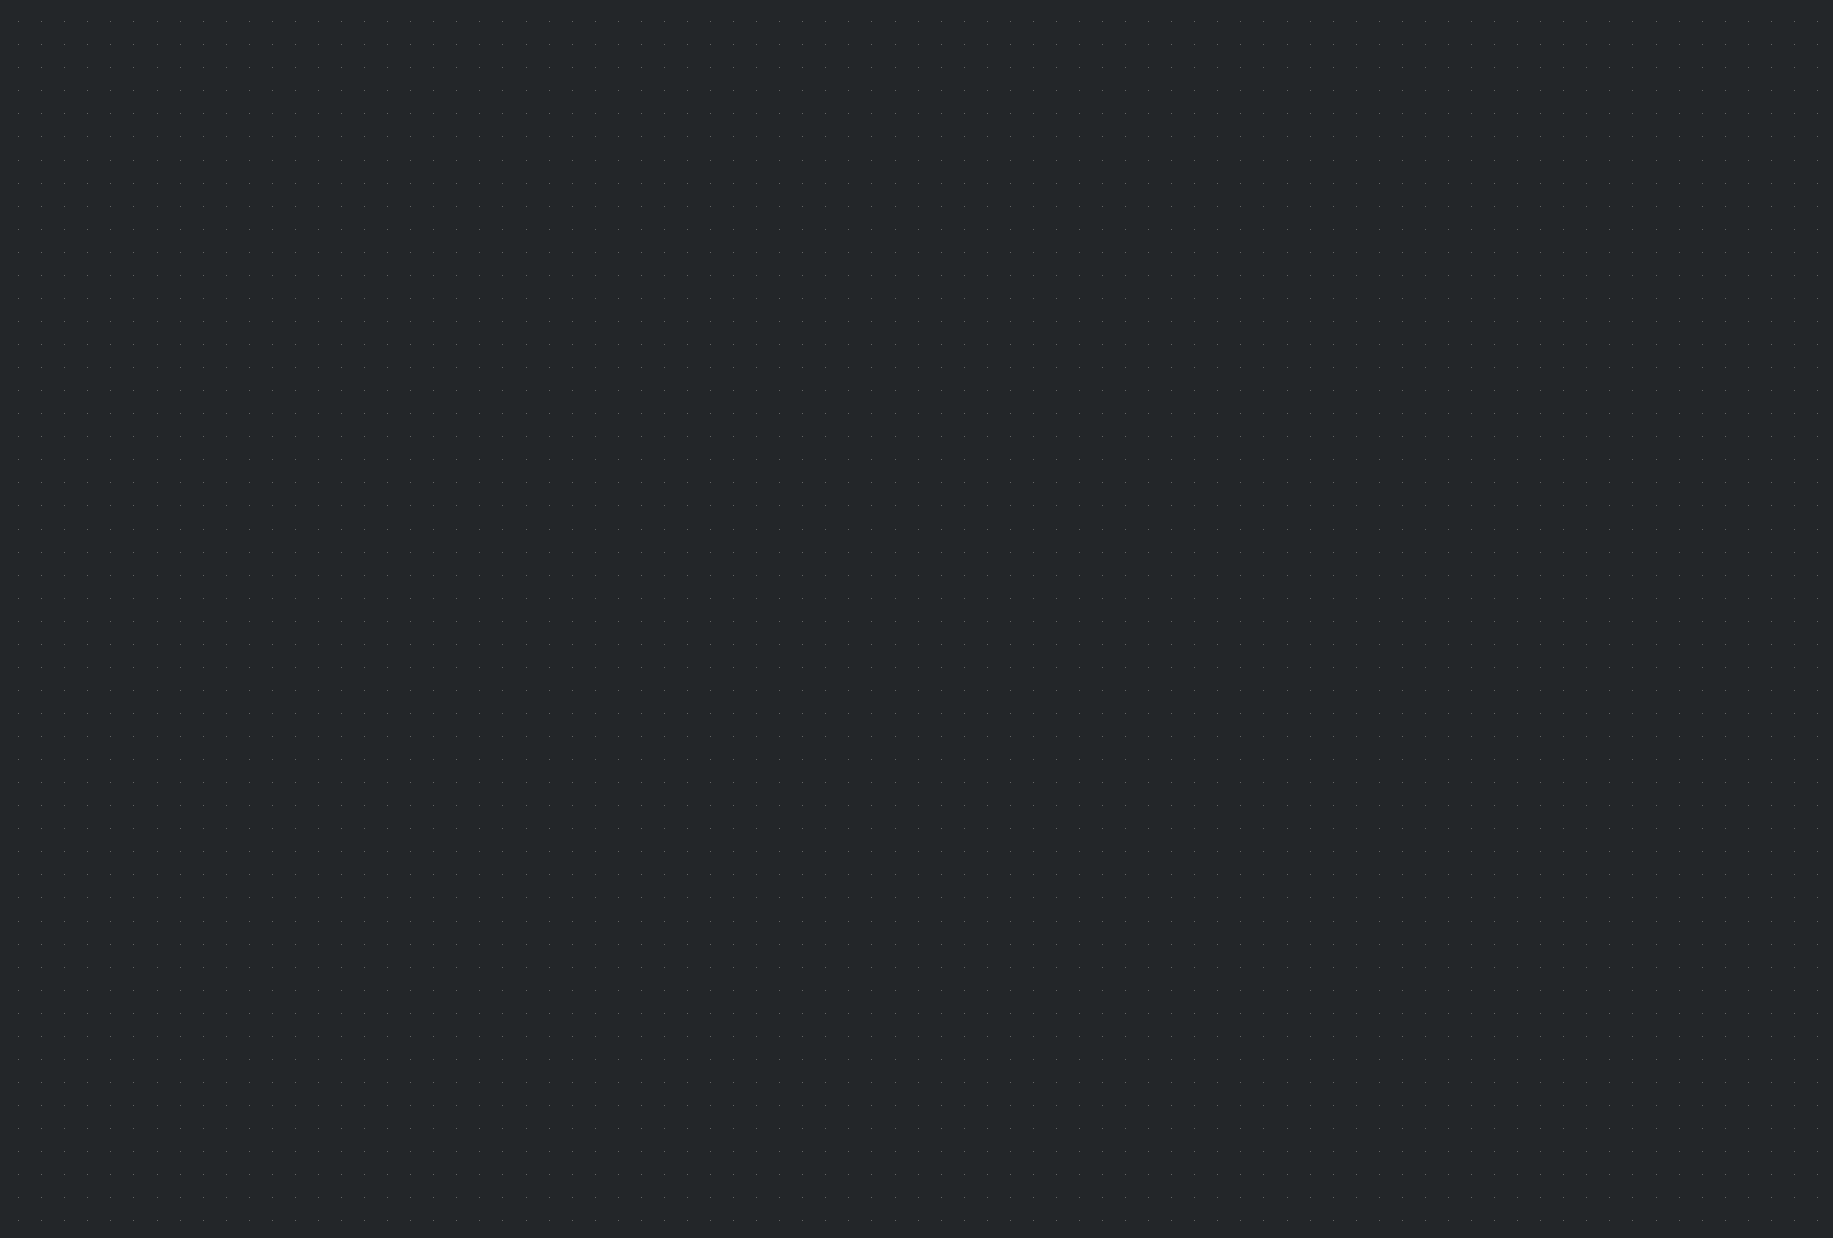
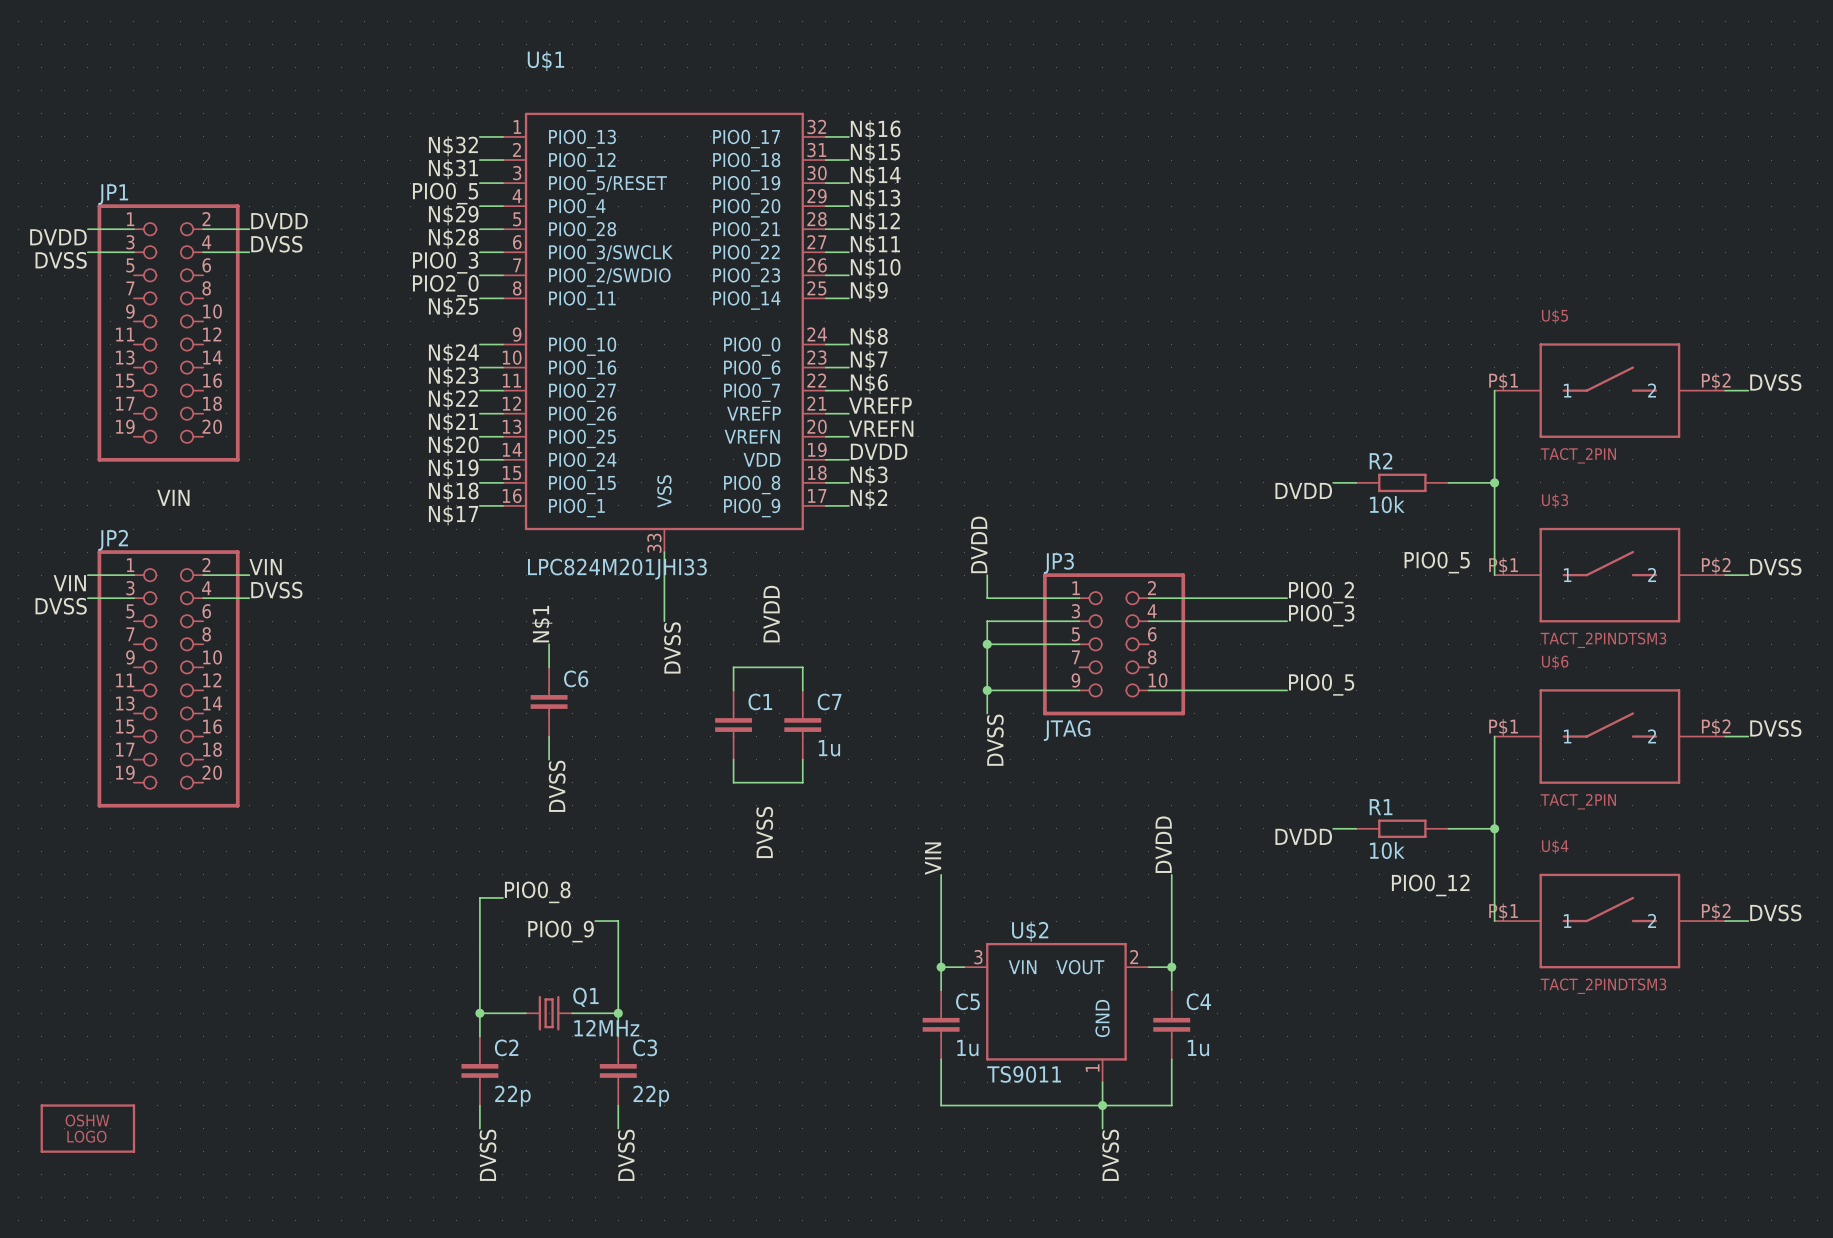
label: none -> N$16 (875, 130)
wire: none -> (479, 136) (502, 136)
wire: none -> (825, 136) (848, 136)
label: none -> N$32 (453, 146)
label: none -> N$15 (875, 153)
wire: none -> (479, 160) (502, 160)
wire: none -> (825, 160) (848, 160)
label: none -> N$31 (453, 169)
label: none -> N$14 (875, 176)
wire: none -> (479, 183) (502, 183)
wire: none -> (825, 183) (848, 183)
label: none -> PIO0_5 (445, 193)
label: none -> N$13 (875, 199)
wire: none -> (479, 206) (502, 206)
wire: none -> (825, 206) (848, 206)
label: none -> N$29 (453, 215)
label: none -> DVDD (279, 221)
label: none -> N$12 (875, 222)
wire: none -> (87, 229) (133, 229)
wire: none -> (203, 229) (249, 229)
wire: none -> (479, 229) (502, 229)
wire: none -> (825, 229) (848, 229)
label: none -> DVDD (58, 237)
label: none -> N$28 (453, 238)
label: none -> DVSS (276, 244)
label: none -> N$11 (875, 245)
wire: none -> (87, 252) (133, 252)
wire: none -> (203, 252) (249, 252)
wire: none -> (479, 252) (502, 252)
wire: none -> (825, 252) (848, 252)
label: none -> DVSS (61, 260)
label: none -> PIO0_3 (445, 262)
label: none -> N$10 (875, 268)
wire: none -> (479, 275) (502, 275)
wire: none -> (825, 275) (848, 275)
label: none -> PIO2_0 (445, 285)
label: none -> N$9 (869, 291)
wire: none -> (479, 298) (502, 298)
wire: none -> (825, 298) (848, 298)
label: none -> N$25 (453, 307)
JP1: none -> (168, 332)
U$1: none -> LPC824M201JHI33 (664, 332)
label: none -> N$8 (869, 337)
wire: none -> (479, 344) (502, 344)
wire: none -> (825, 344) (848, 344)
label: none -> N$24 (453, 353)
label: none -> N$7 (869, 360)
wire: none -> (479, 367) (502, 367)
wire: none -> (825, 367) (848, 367)
label: none -> N$23 (453, 376)
label: none -> DVSS (1775, 382)
label: none -> N$6 (869, 383)
wire: none -> (479, 390) (502, 390)
wire: none -> (825, 390) (848, 390)
wire: none -> (1494, 390) (1494, 575)
U$5: none -> TACT_2PIN (1609, 390)
wire: none -> (1725, 390) (1748, 390)
label: none -> N$22 (453, 399)
label: none -> VREFP (880, 405)
wire: none -> (479, 413) (502, 413)
wire: none -> (825, 413) (848, 413)
label: none -> N$21 (453, 423)
label: none -> VREFN (881, 428)
wire: none -> (479, 436) (502, 436)
wire: none -> (825, 436) (848, 436)
label: none -> N$20 (453, 446)
label: none -> DVDD (879, 451)
wire: none -> (479, 459) (502, 459)
wire: none -> (825, 459) (848, 459)
label: none -> N$19 (453, 469)
label: none -> N$3 (869, 476)
wire: none -> (479, 482) (502, 482)
wire: none -> (825, 482) (848, 482)
wire: none -> (1333, 482) (1356, 482)
R2: none -> 10k (1402, 482)
wire: none -> (1448, 482) (1494, 482)
junction: none -> (1494, 482)
label: none -> DVDD (1303, 490)
label: none -> N$18 (453, 492)
label: none -> VIN (173, 497)
label: none -> N$2 (869, 499)
wire: none -> (479, 505) (502, 505)
wire: none -> (825, 505) (848, 505)
label: none -> N$17 (453, 515)
label: none -> DVDD (979, 544)
wire: none -> (664, 552) (664, 621)
label: none -> PIO0_5 (1437, 562)
label: none -> VIN (265, 567)
label: none -> DVSS (1775, 567)
wire: none -> (87, 575) (133, 575)
wire: none -> (203, 575) (249, 575)
wire: none -> (987, 575) (987, 598) (1079, 598)
U$3: none -> TACT_2PINDTSM3 (1609, 575)
wire: none -> (1725, 575) (1748, 575)
label: none -> VIN (69, 583)
label: none -> DVSS (276, 590)
label: none -> PIO0_2 (1321, 592)
wire: none -> (87, 598) (133, 598)
wire: none -> (203, 598) (249, 598)
wire: none -> (1148, 598) (1287, 598)
label: none -> DVSS (61, 606)
label: none -> DVDD (771, 614)
label: none -> PIO0_3 (1321, 615)
wire: none -> (1079, 621) (987, 621) (987, 713)
wire: none -> (1148, 621) (1287, 621)
label: none -> N$1 (542, 624)
wire: none -> (549, 644) (549, 667)
wire: none -> (987, 644) (1079, 644)
junction: none -> (987, 644)
JP3: none -> JTAG (1114, 644)
label: none -> DVSS (672, 647)
JP2: none -> (168, 678)
label: none -> PIO0_5 (1321, 684)
wire: none -> (733, 690) (733, 667) (802, 667) (802, 690)
wire: none -> (987, 690) (1079, 690)
junction: none -> (987, 690)
wire: none -> (1148, 690) (1287, 690)
C6: none -> (549, 701)
C1: none -> (733, 725)
C7: none -> 1u (802, 725)
label: none -> DVSS (1775, 728)
wire: none -> (549, 736) (549, 759)
wire: none -> (1494, 736) (1494, 921)
U$6: none -> TACT_2PIN (1609, 736)
wire: none -> (1725, 736) (1748, 736)
label: none -> DVSS (995, 740)
wire: none -> (733, 759) (733, 782) (802, 782) (802, 759)
label: none -> DVSS (557, 786)
wire: none -> (1333, 828) (1356, 828)
R1: none -> 10k (1402, 828)
wire: none -> (1448, 828) (1494, 828)
junction: none -> (1494, 828)
label: none -> DVSS (764, 832)
label: none -> DVDD (1303, 836)
label: none -> DVDD (1163, 844)
label: none -> VIN (933, 858)
wire: none -> (941, 874) (941, 990)
wire: none -> (1171, 874) (1171, 990)
label: none -> PIO0_12 (1430, 885)
label: none -> PIO0_8 (537, 892)
wire: none -> (502, 897) (479, 897) (479, 1036)
label: none -> DVSS (1775, 912)
wire: none -> (595, 921) (618, 921) (618, 1036)
U$4: none -> TACT_2PINDTSM3 (1609, 921)
wire: none -> (1725, 921) (1748, 921)
label: none -> PIO0_9 (561, 931)
wire: none -> (941, 967) (964, 967)
junction: none -> (941, 967)
wire: none -> (1148, 967) (1171, 967)
junction: none -> (1171, 967)
U$2: none -> TS9011 (1056, 1012)
wire: none -> (479, 1013) (526, 1013)
junction: none -> (479, 1013)
Q1: none -> 12MHz (549, 1013)
wire: none -> (572, 1013) (618, 1013)
junction: none -> (618, 1013)
C5: none -> 1u (941, 1024)
C4: none -> 1u (1171, 1024)
wire: none -> (941, 1059) (941, 1105) (1171, 1105) (1171, 1059)
C2: none -> 22p (479, 1070)
C3: none -> 22p (618, 1070)
wire: none -> (1102, 1082) (1102, 1128)
wire: none -> (479, 1105) (479, 1128)
wire: none -> (618, 1105) (618, 1128)
junction: none -> (1102, 1105)
part: none -> (87, 1128)
label: none -> DVSS (487, 1155)
label: none -> DVSS (626, 1155)
label: none -> DVSS (1110, 1155)

